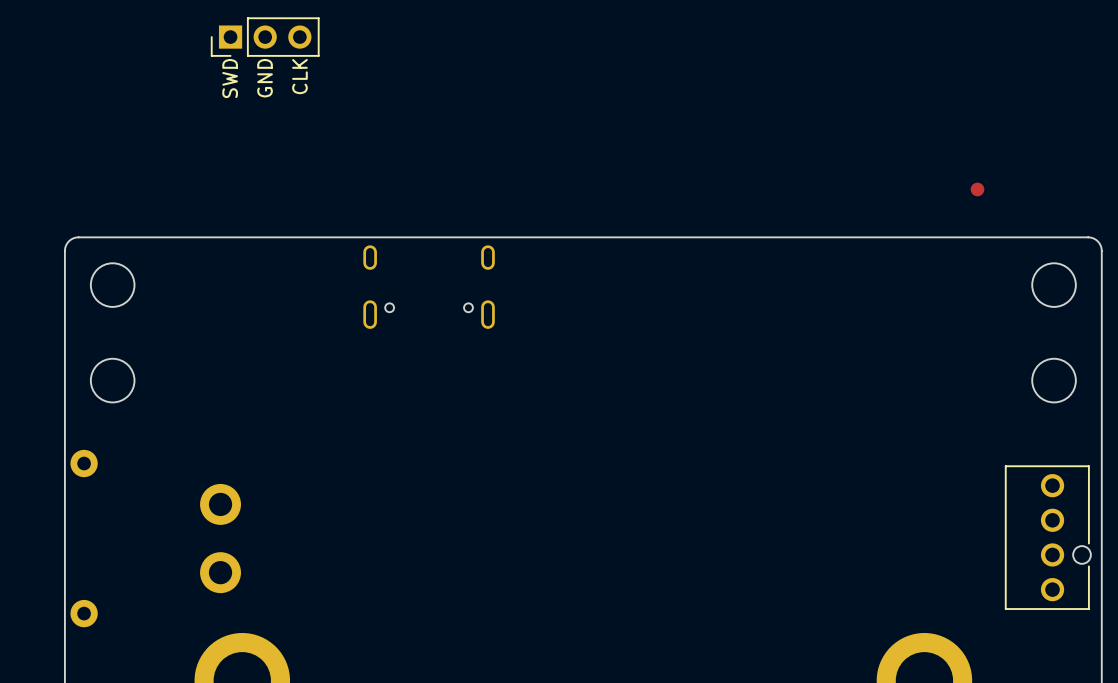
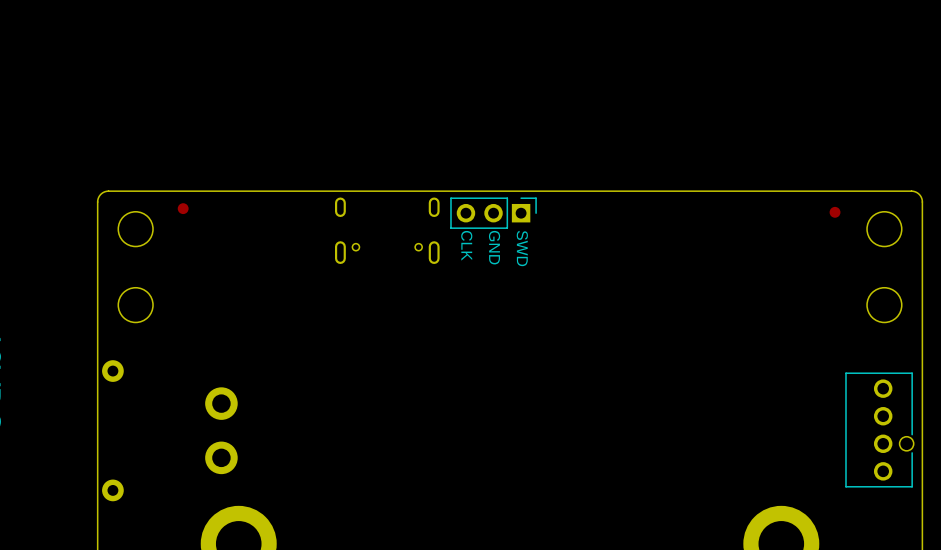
part: (265, 37) -> none
text rotation: 0° (299, 76) -> 180° (466, 245)
text position: CLK (299, 76) -> CLK (466, 245)
text: SWD (230, 78) -> none
text rotation: 0° (265, 78) -> 180° (494, 247)
text position: GND (265, 78) -> GND (494, 247)
part position: (977, 189) -> (835, 212)
part: none -> (183, 208)
part: none -> (493, 213)
text: none -> SWD (522, 248)

